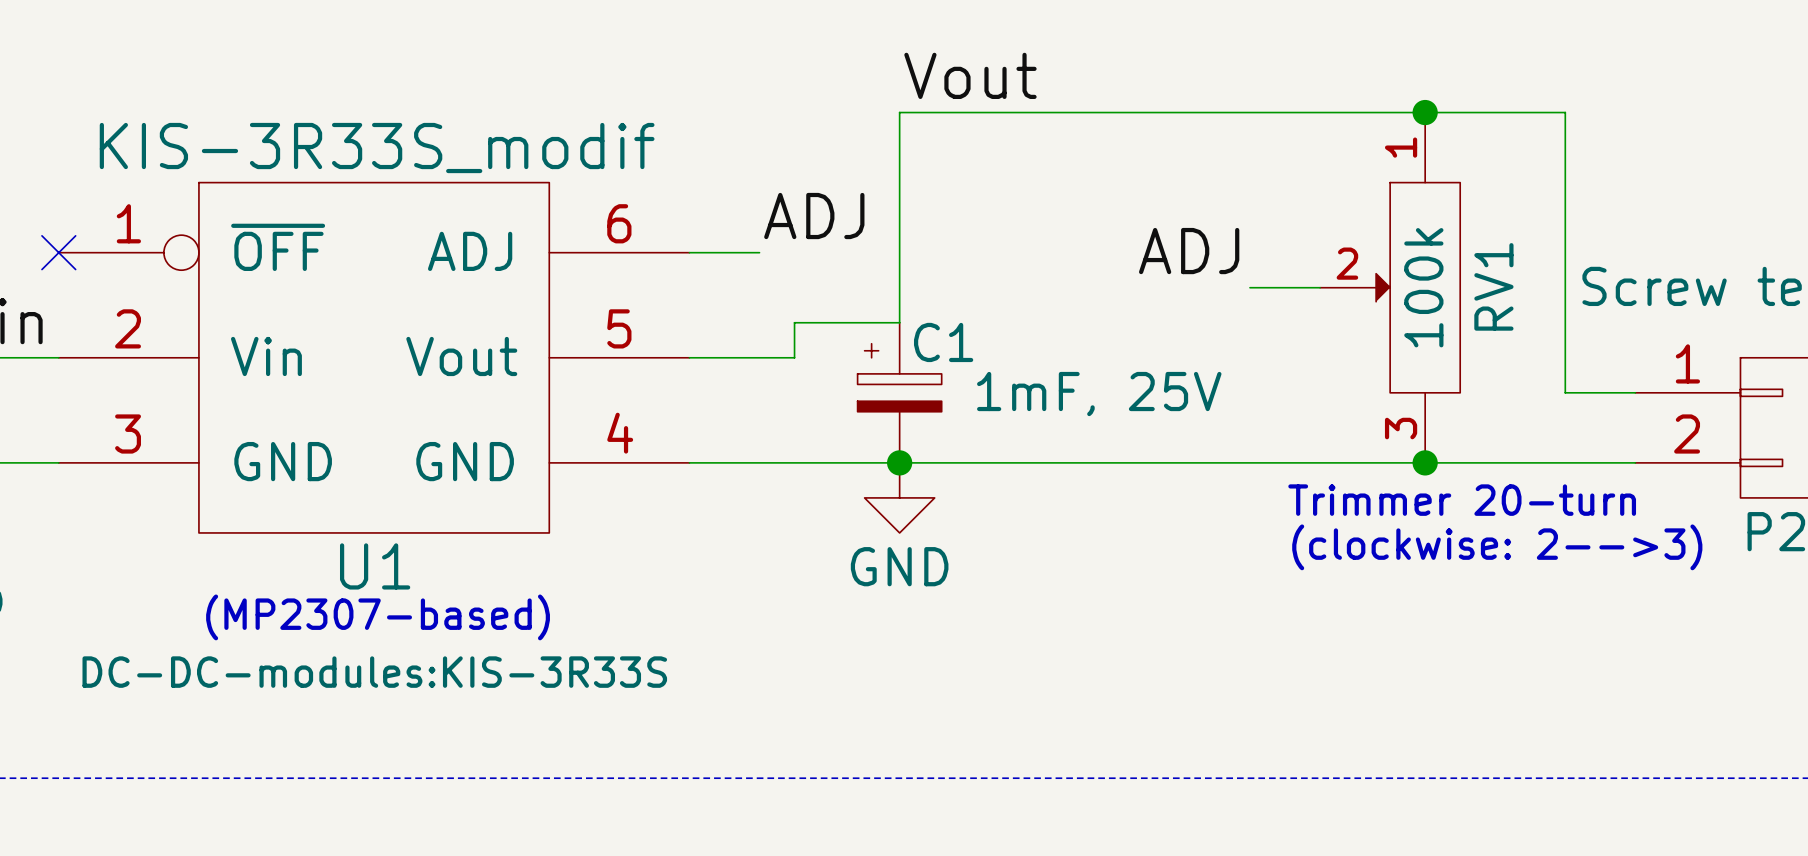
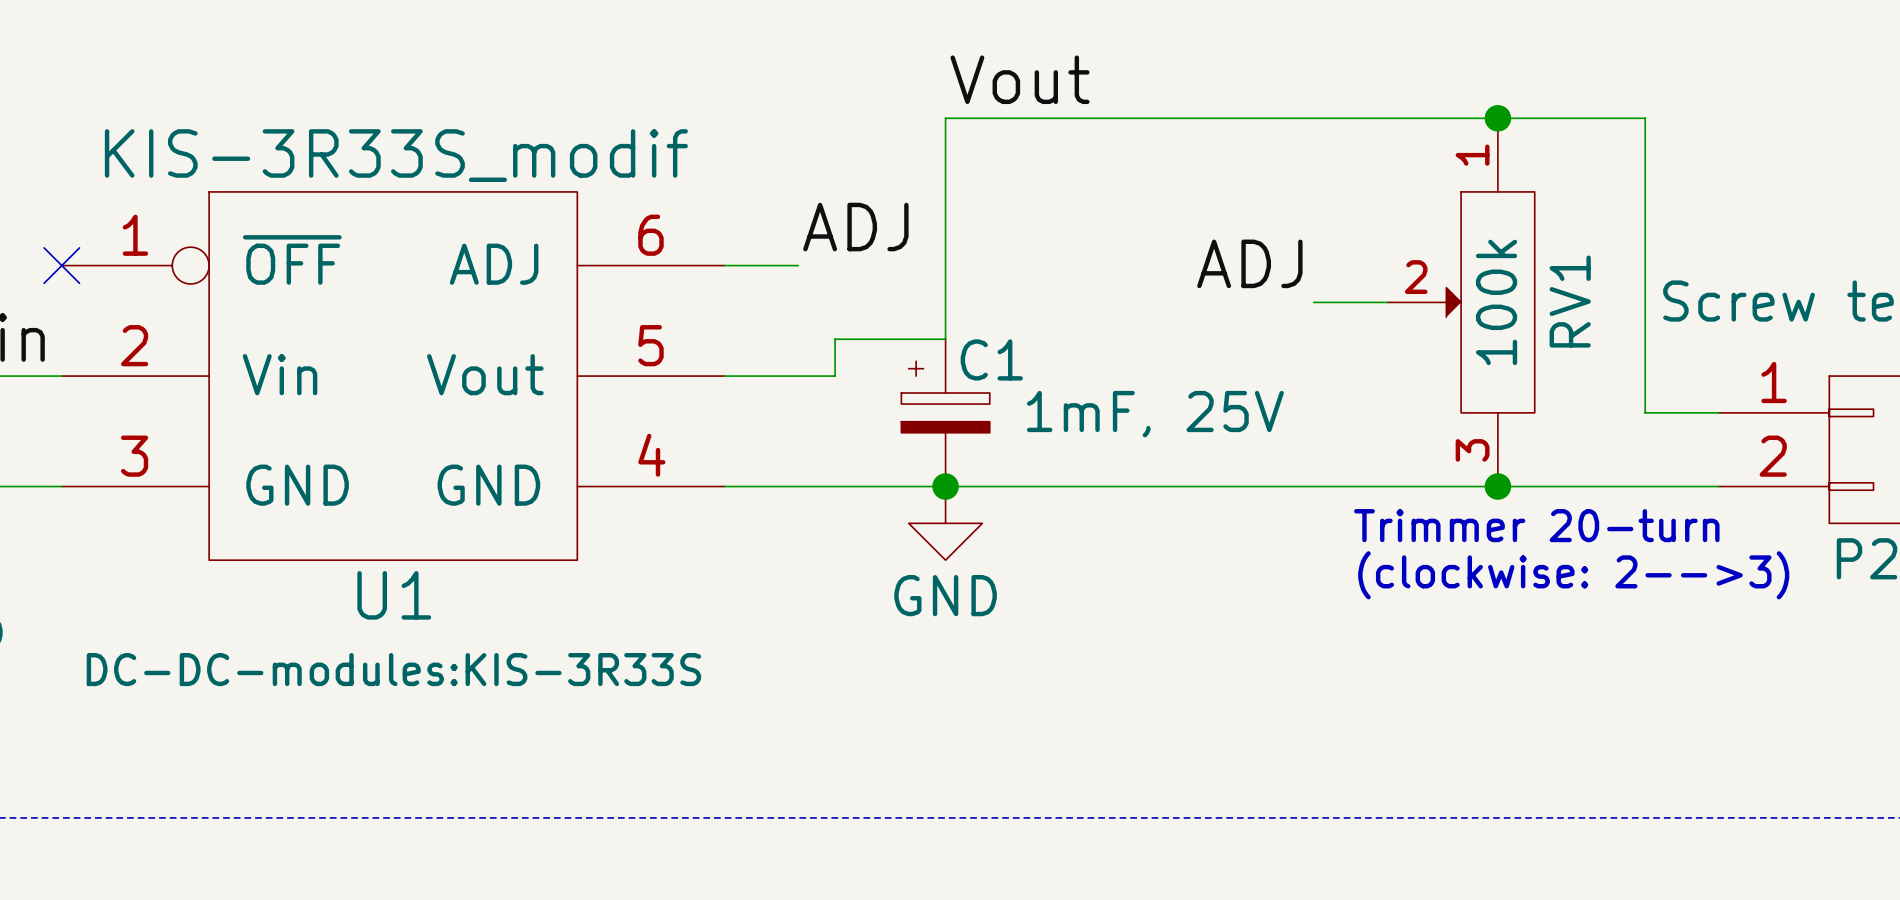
text: (MP2307-based) (378, 617) -> none
U1 text position: DC-DC-modules:KIS-3R33S (374, 672) -> DC-DC-modules:KIS-3R33S (393, 669)

